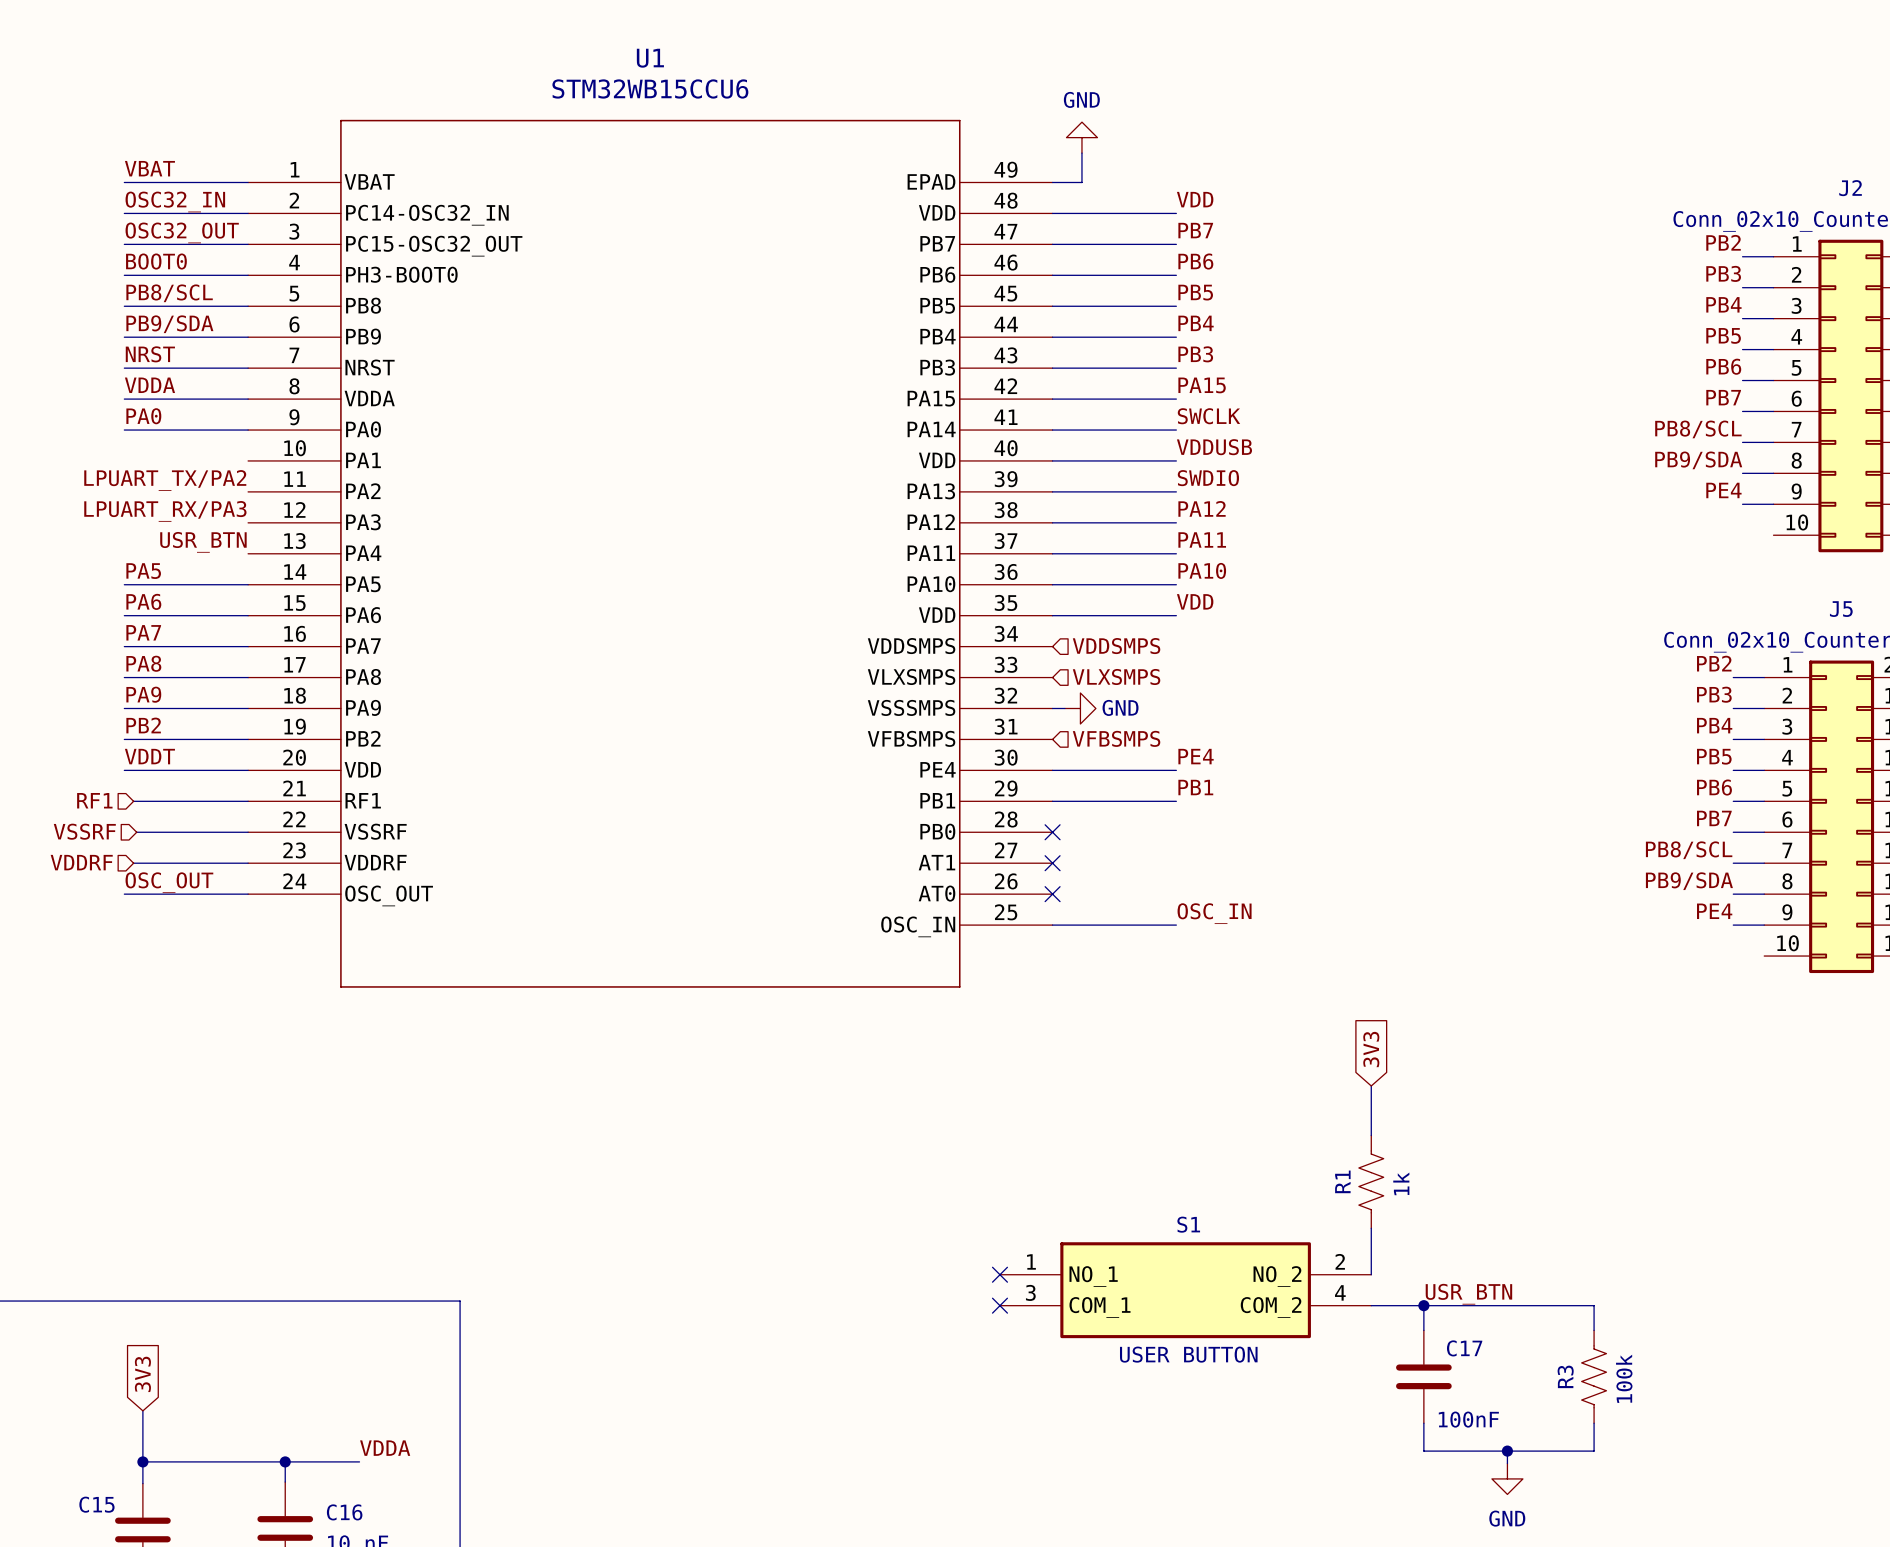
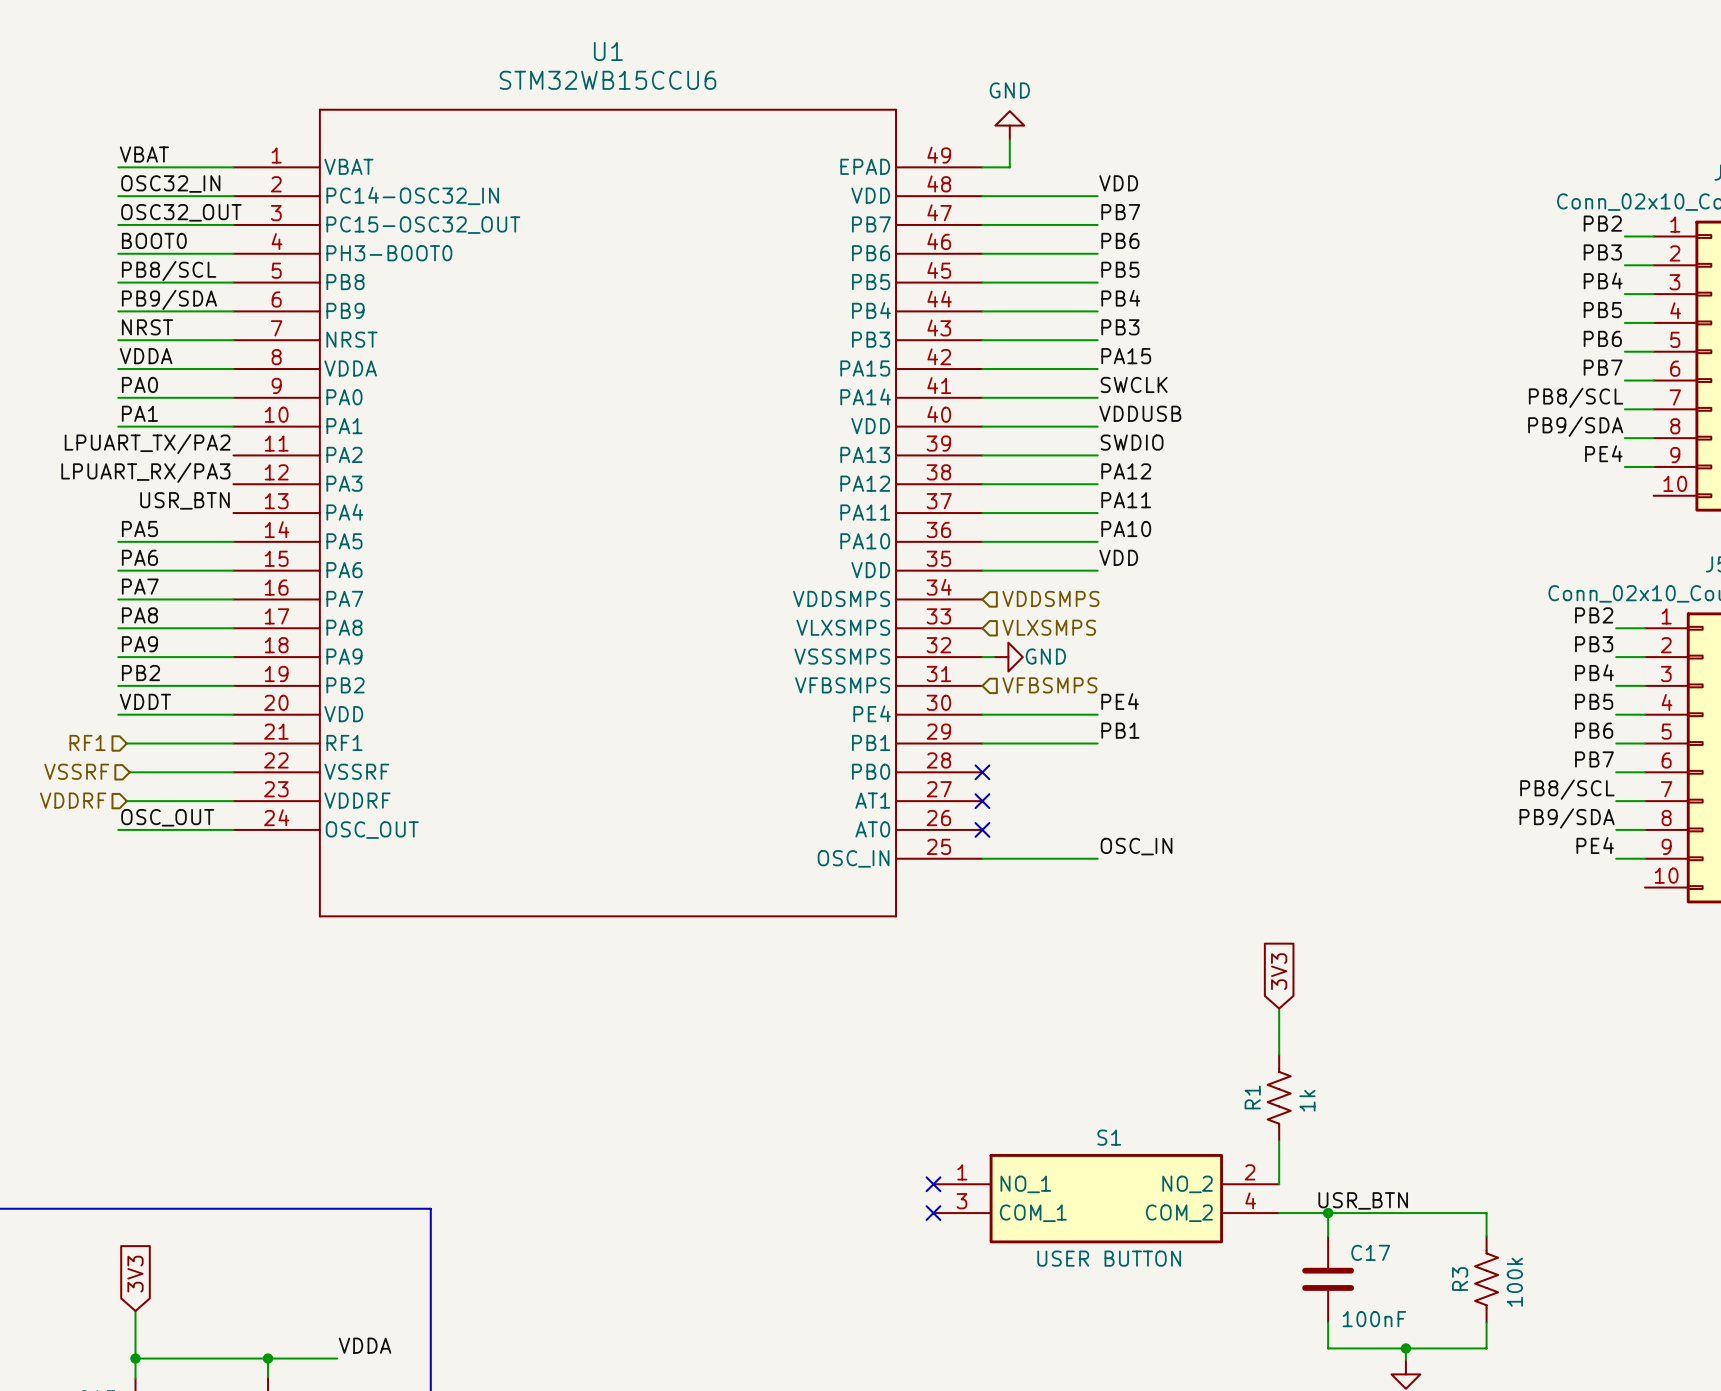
label: none -> PA1 (139, 413)
wire: none -> (118, 426) (233, 426)

